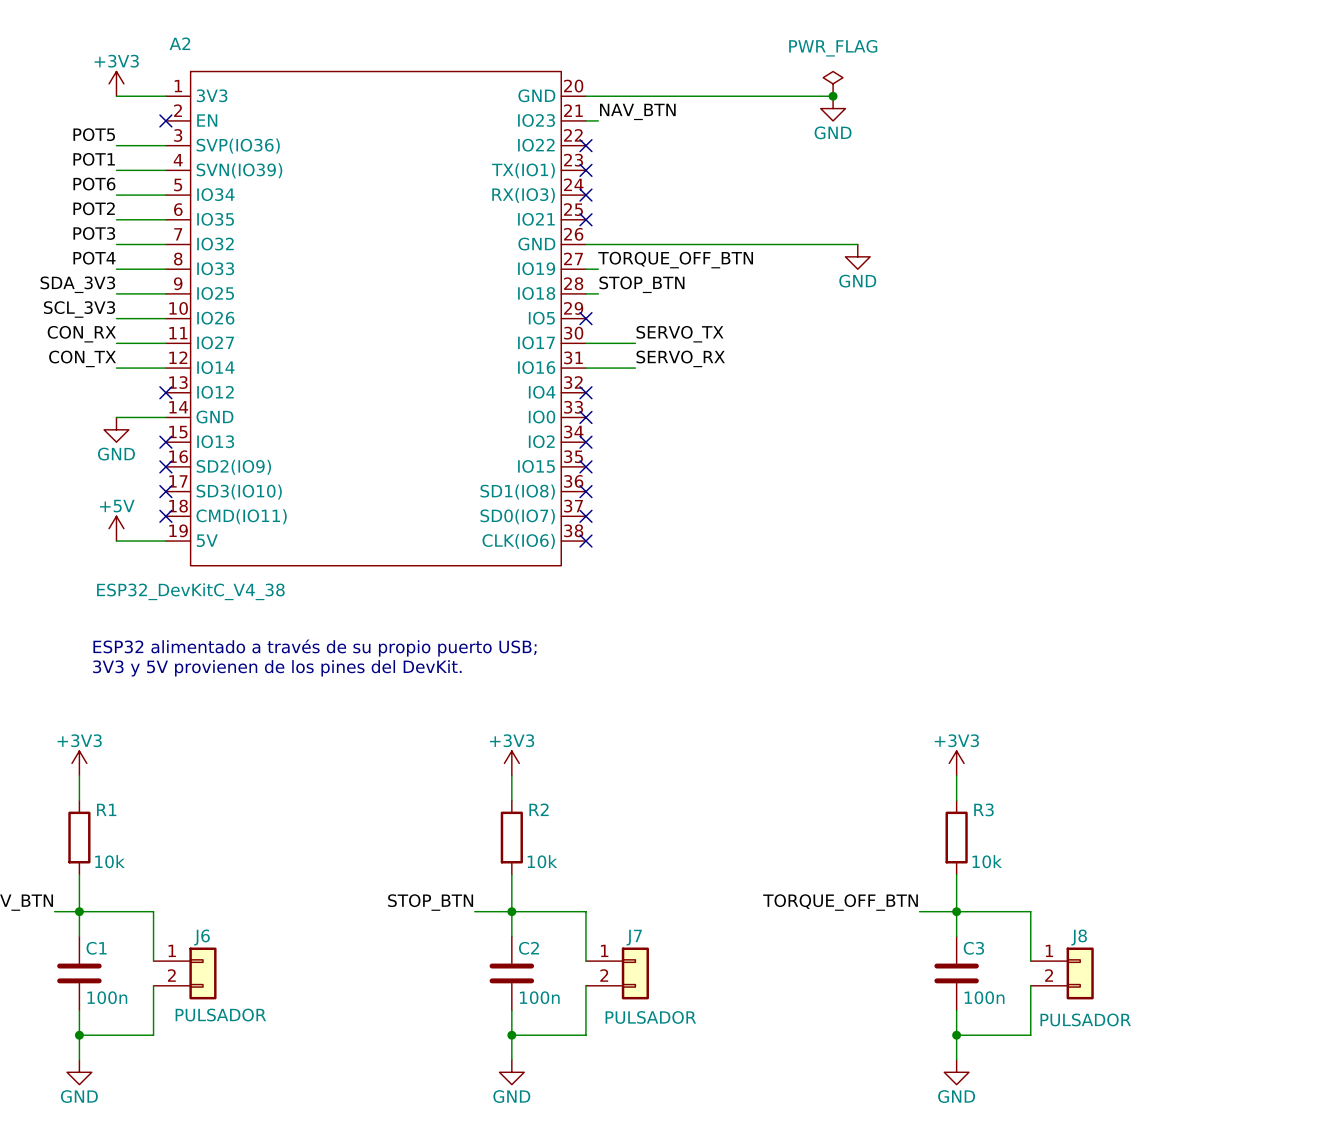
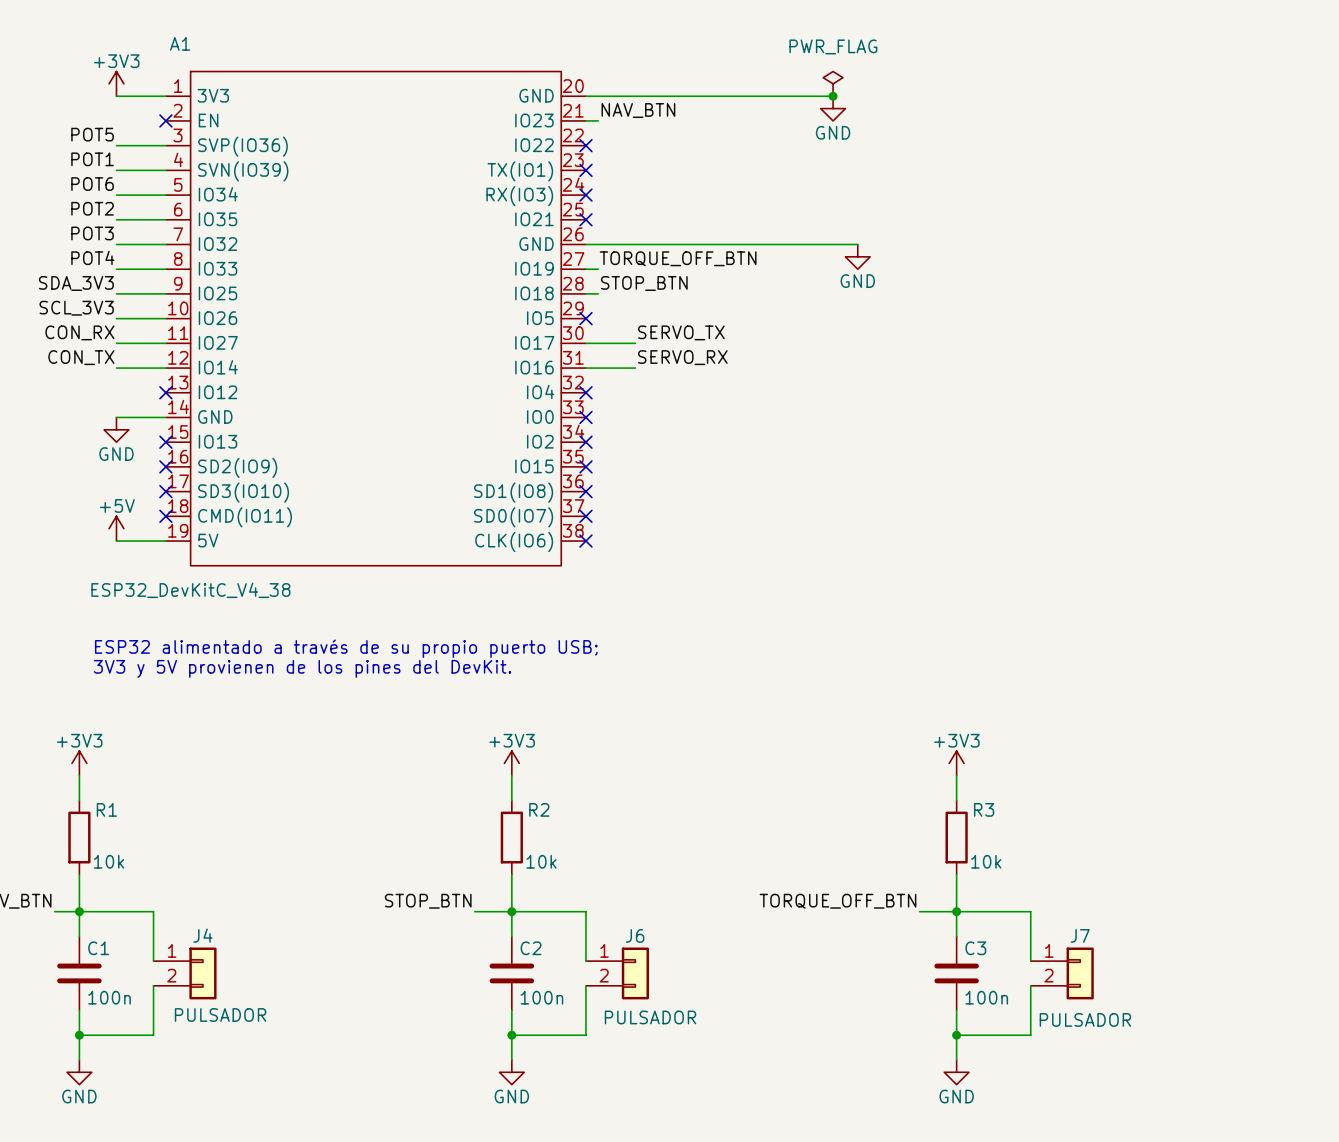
A2 name: A2 (179, 43) -> A1 (180, 43)
J6 name: J6 (201, 937) -> J4 (202, 935)
J7 name: J7 (634, 937) -> J6 (635, 935)
J8 name: J8 (1079, 937) -> J7 (1080, 935)

